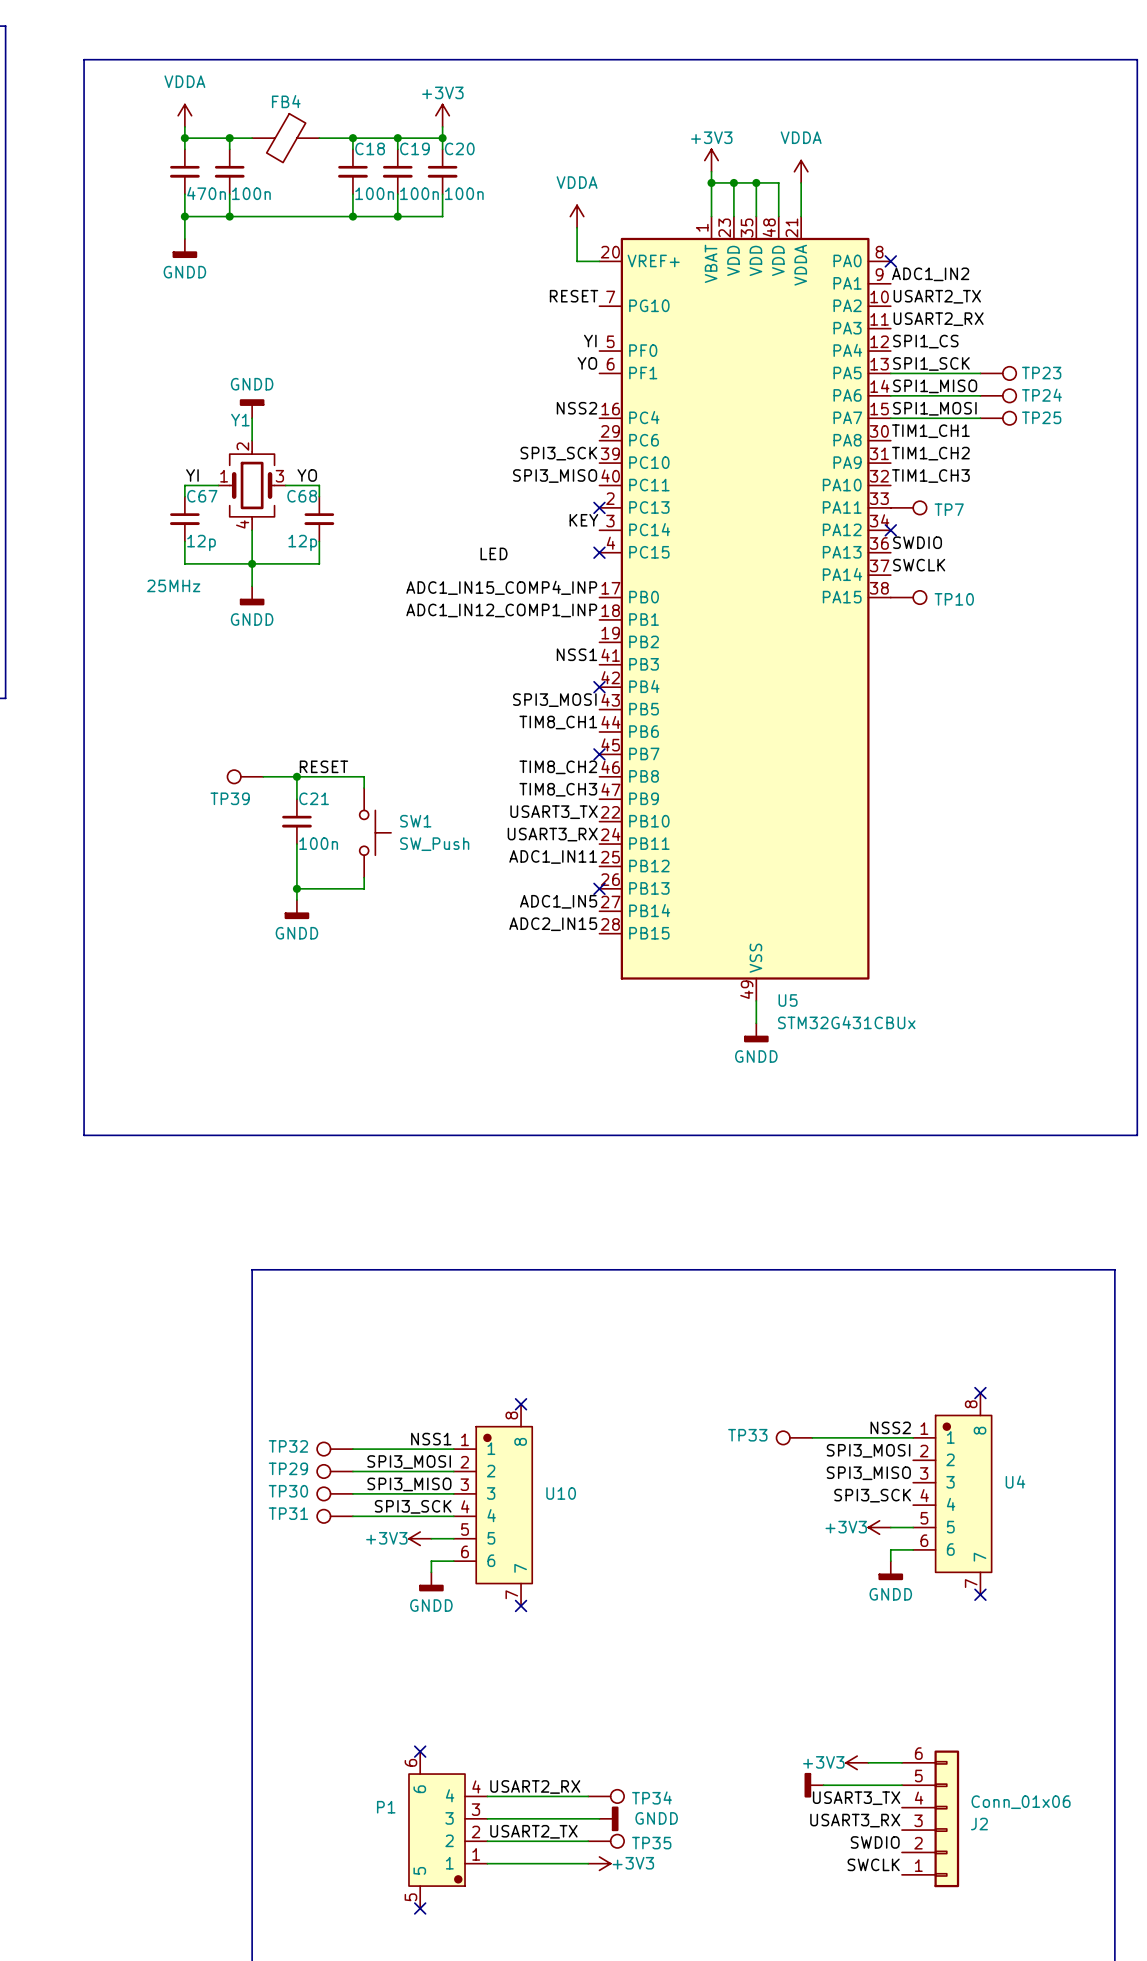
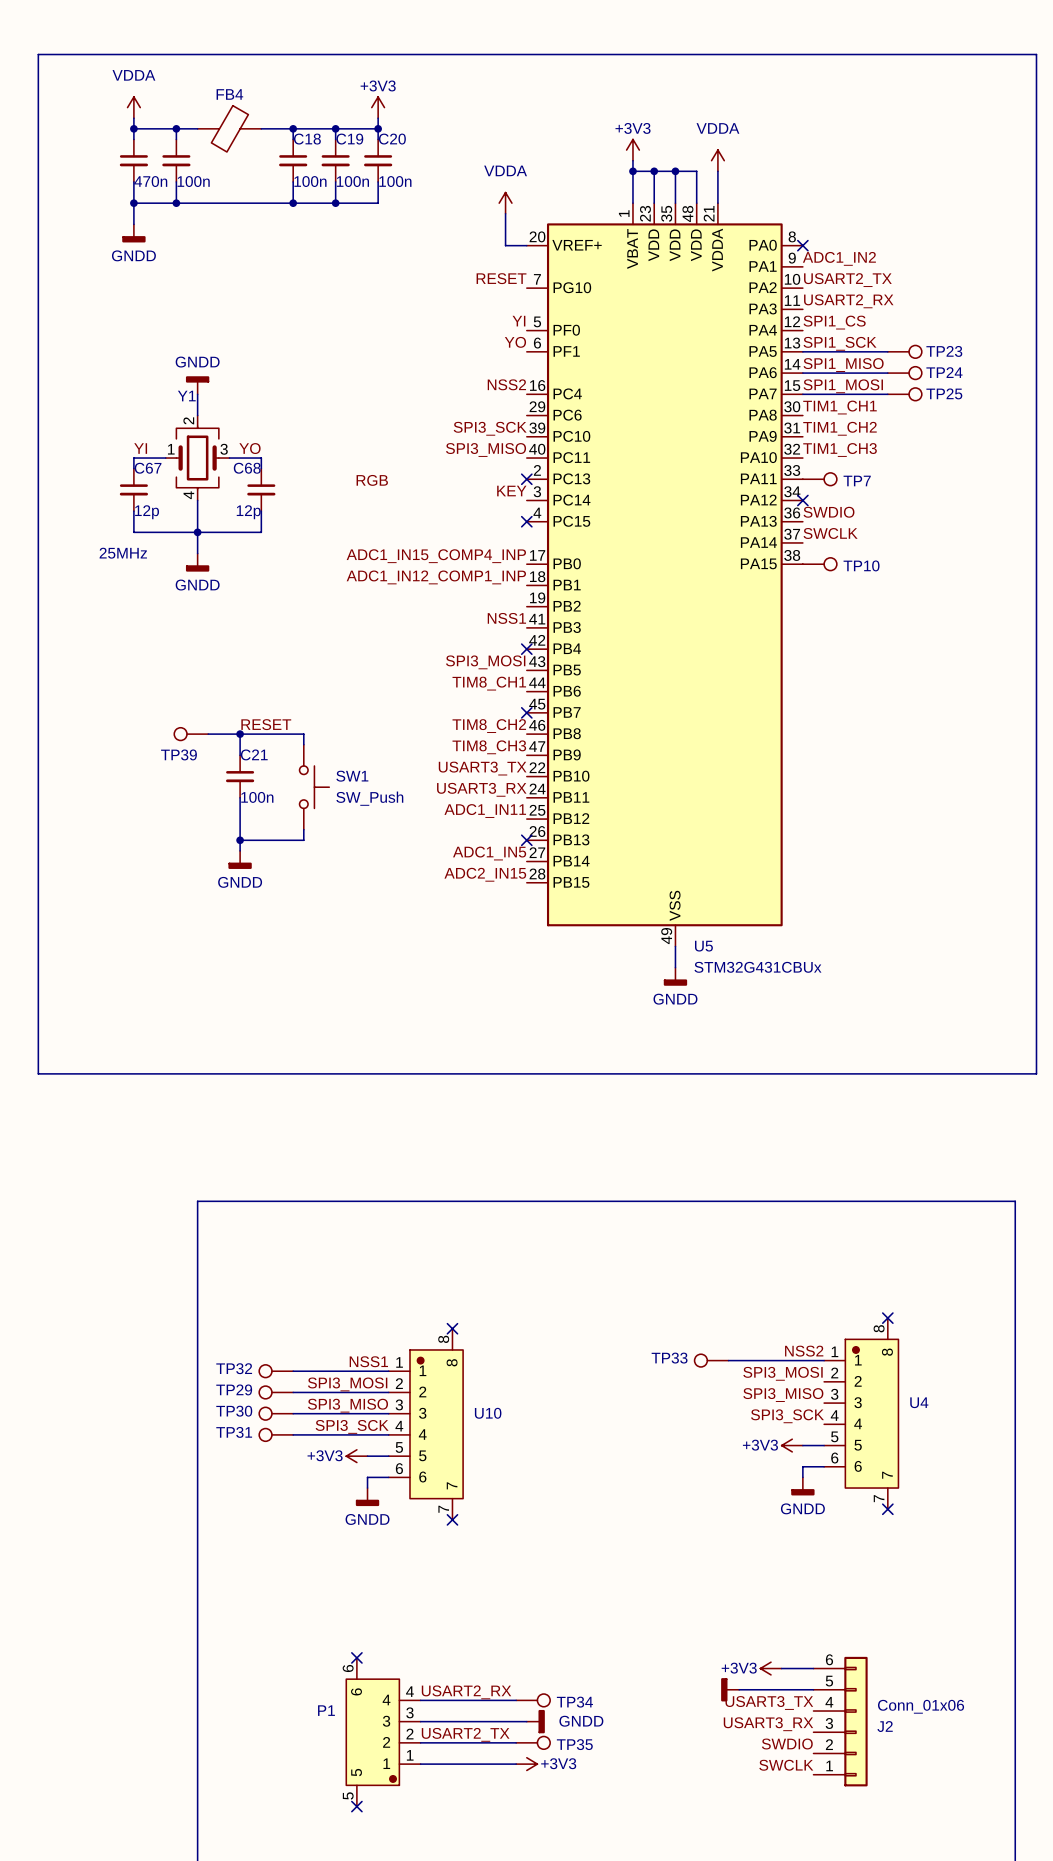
label: none -> RGB (372, 480)
label: LED (494, 553) -> none

